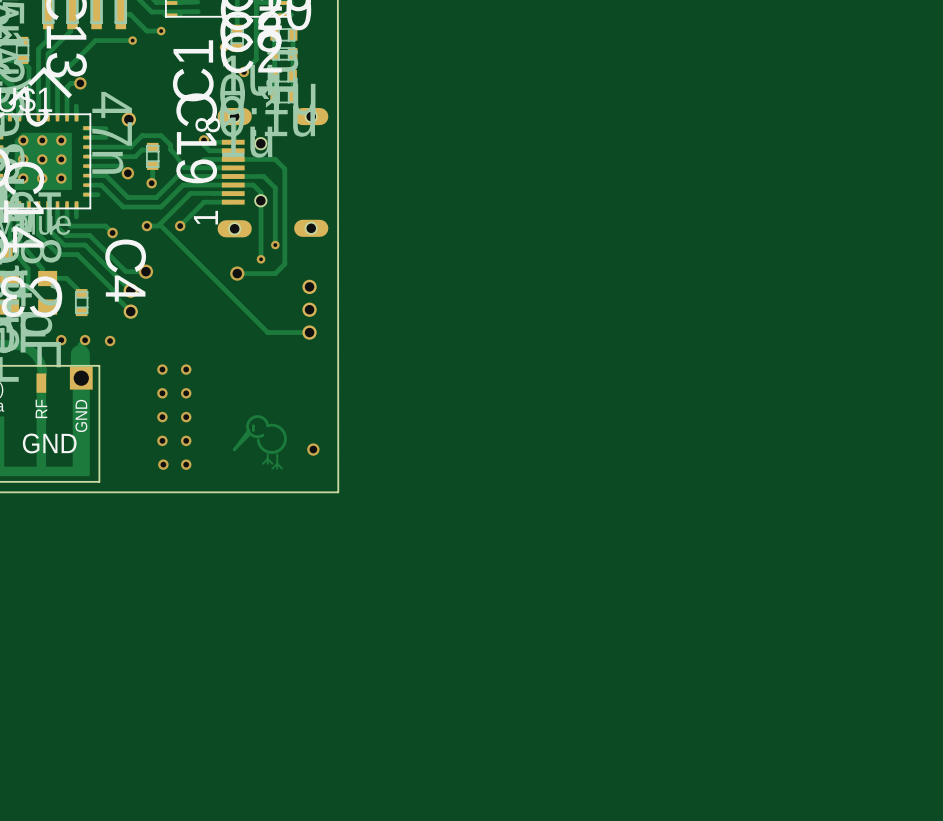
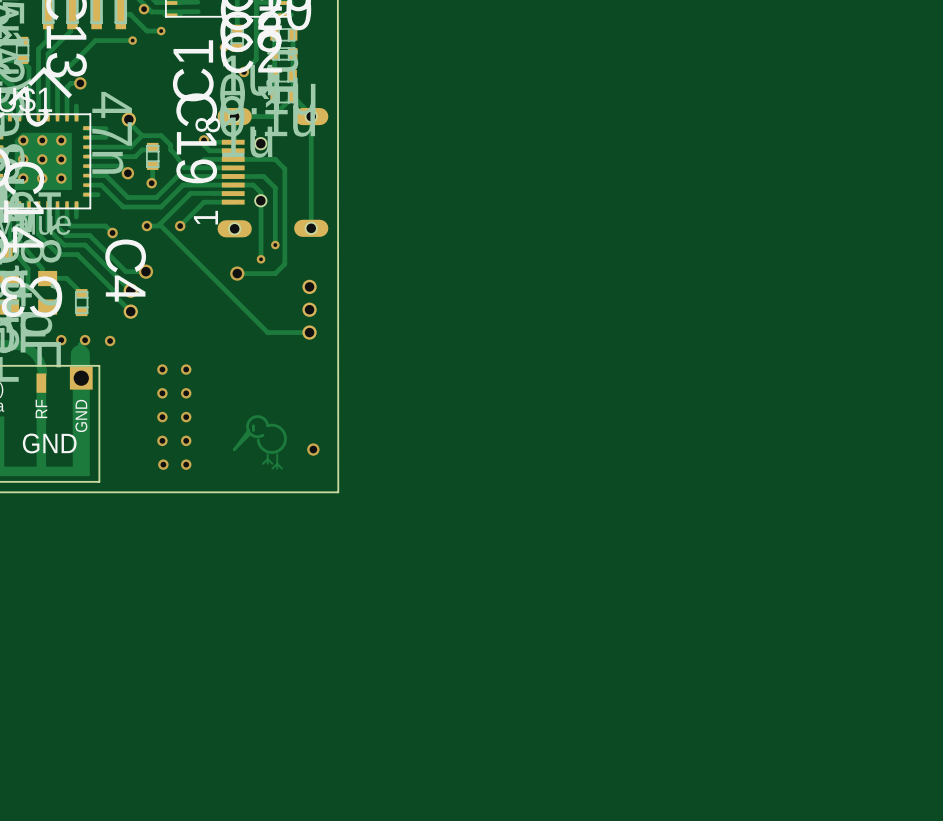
via: none -> (144, 9)
track: none -> (234, 116) (273, 116) (293, 96) (311, 114) (311, 228)
track: none -> (128, 119) (128, 122) (142, 135)

